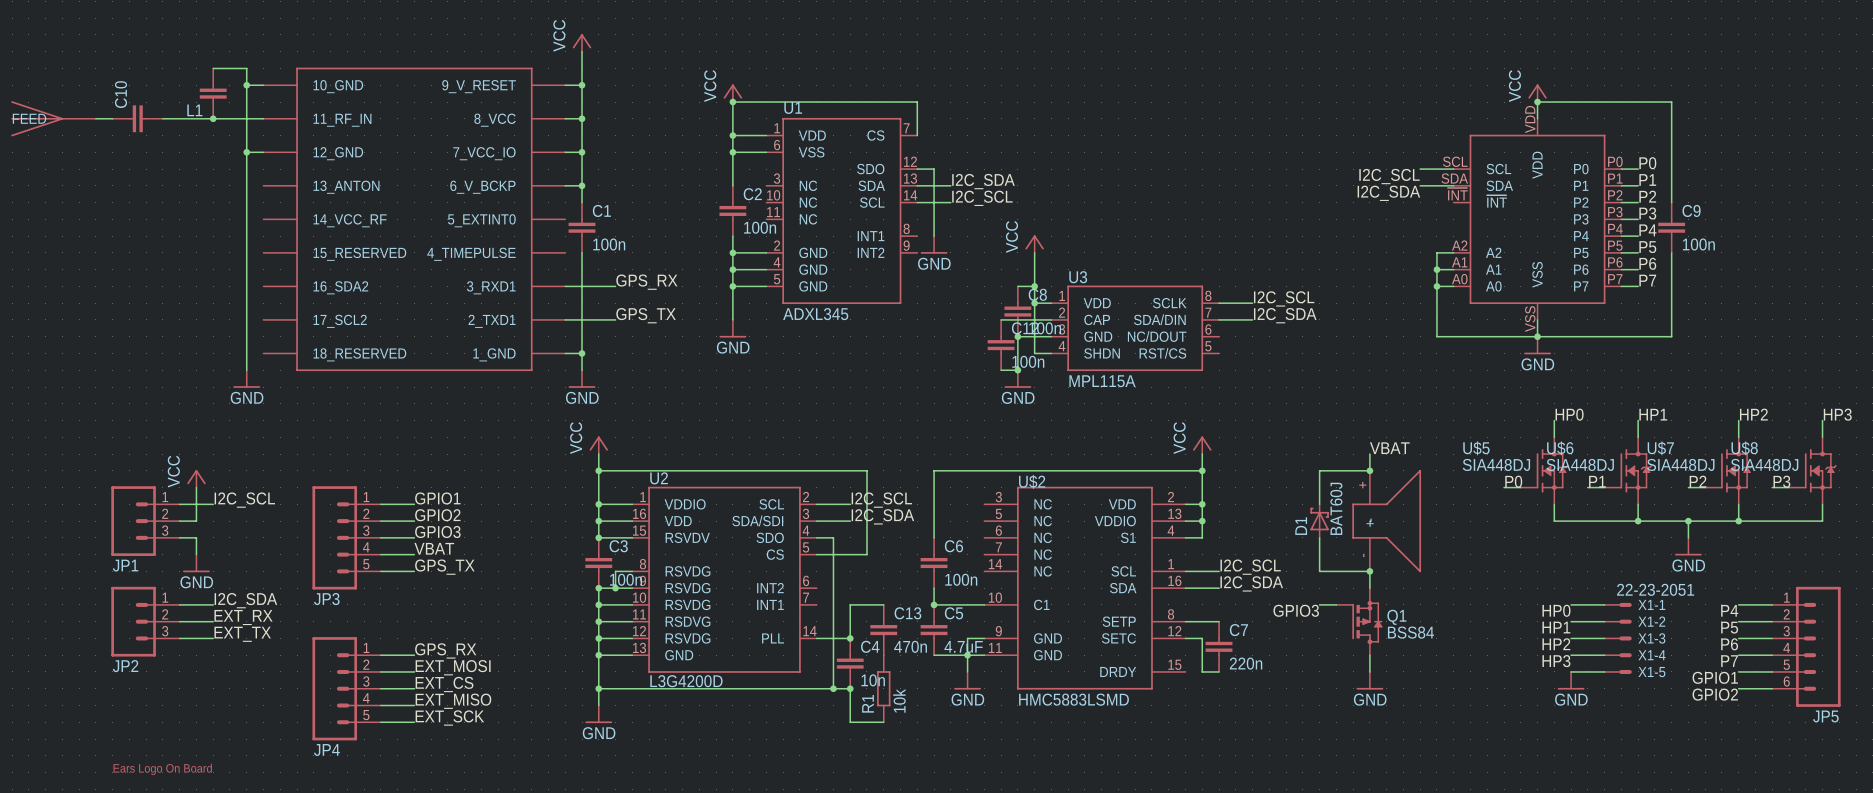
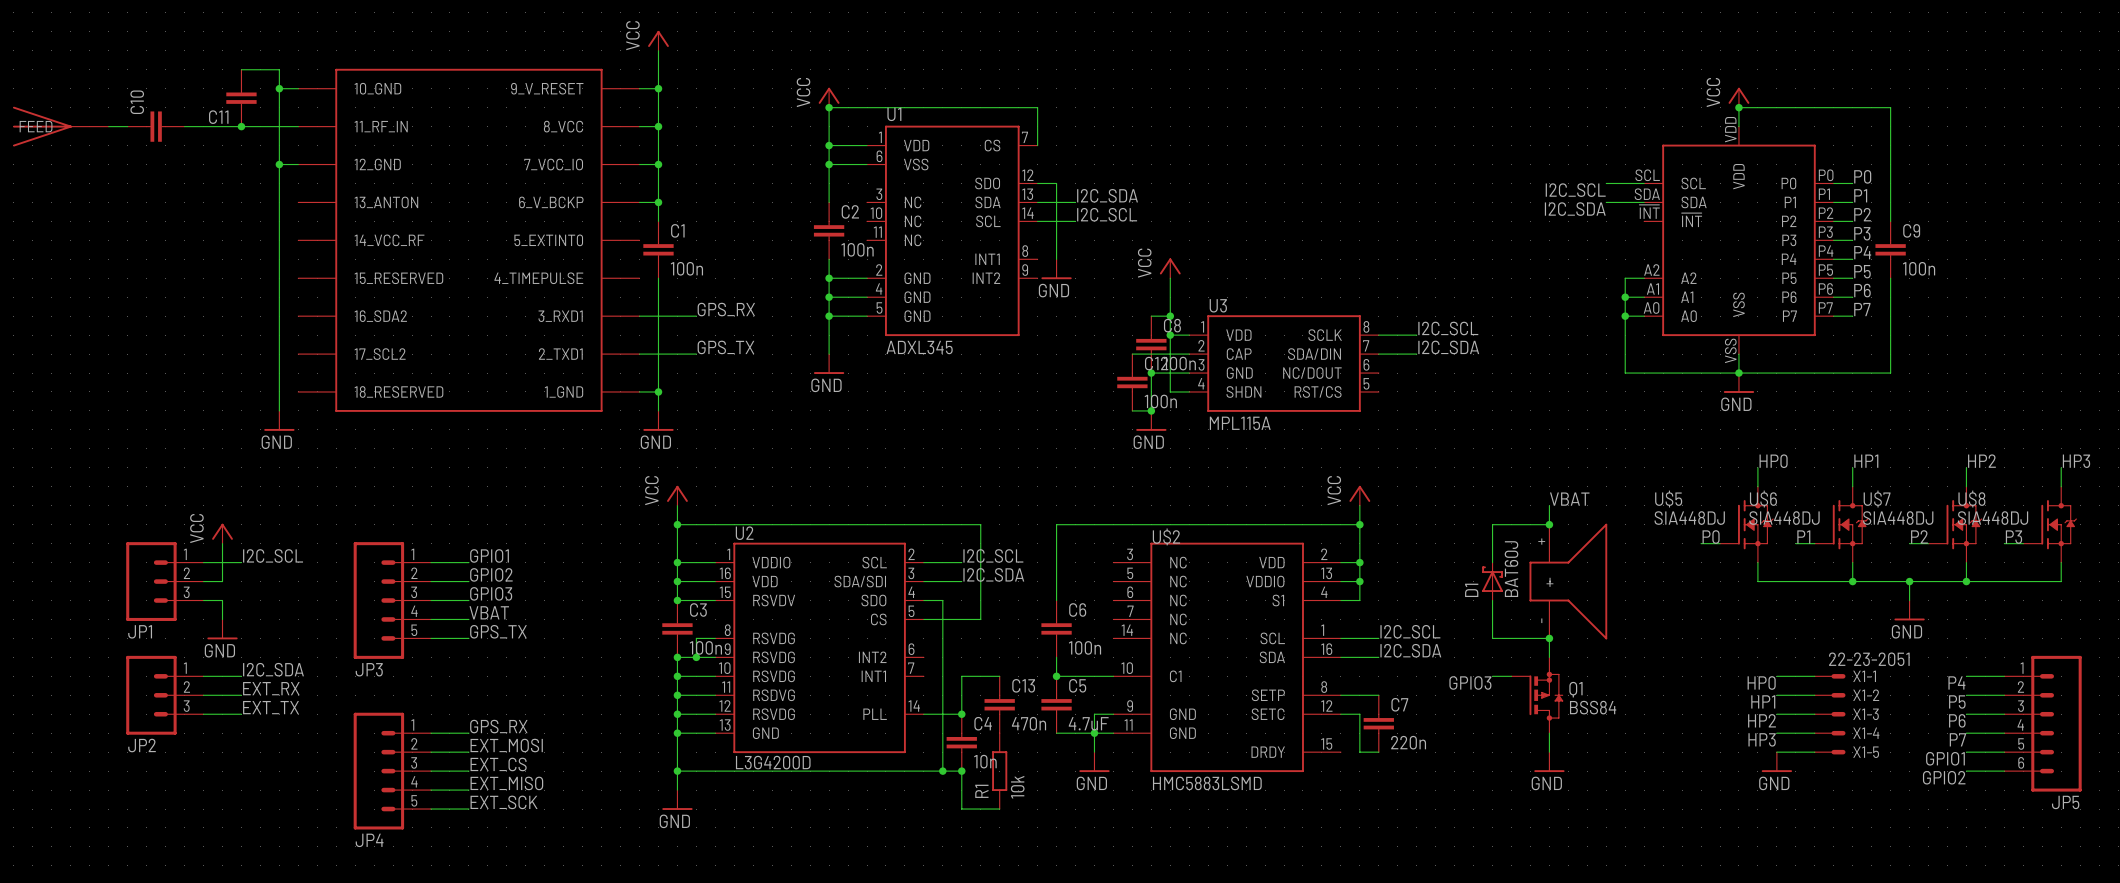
L1 name: L1 (194, 110) -> C11 (218, 117)
part: (162, 769) -> none

